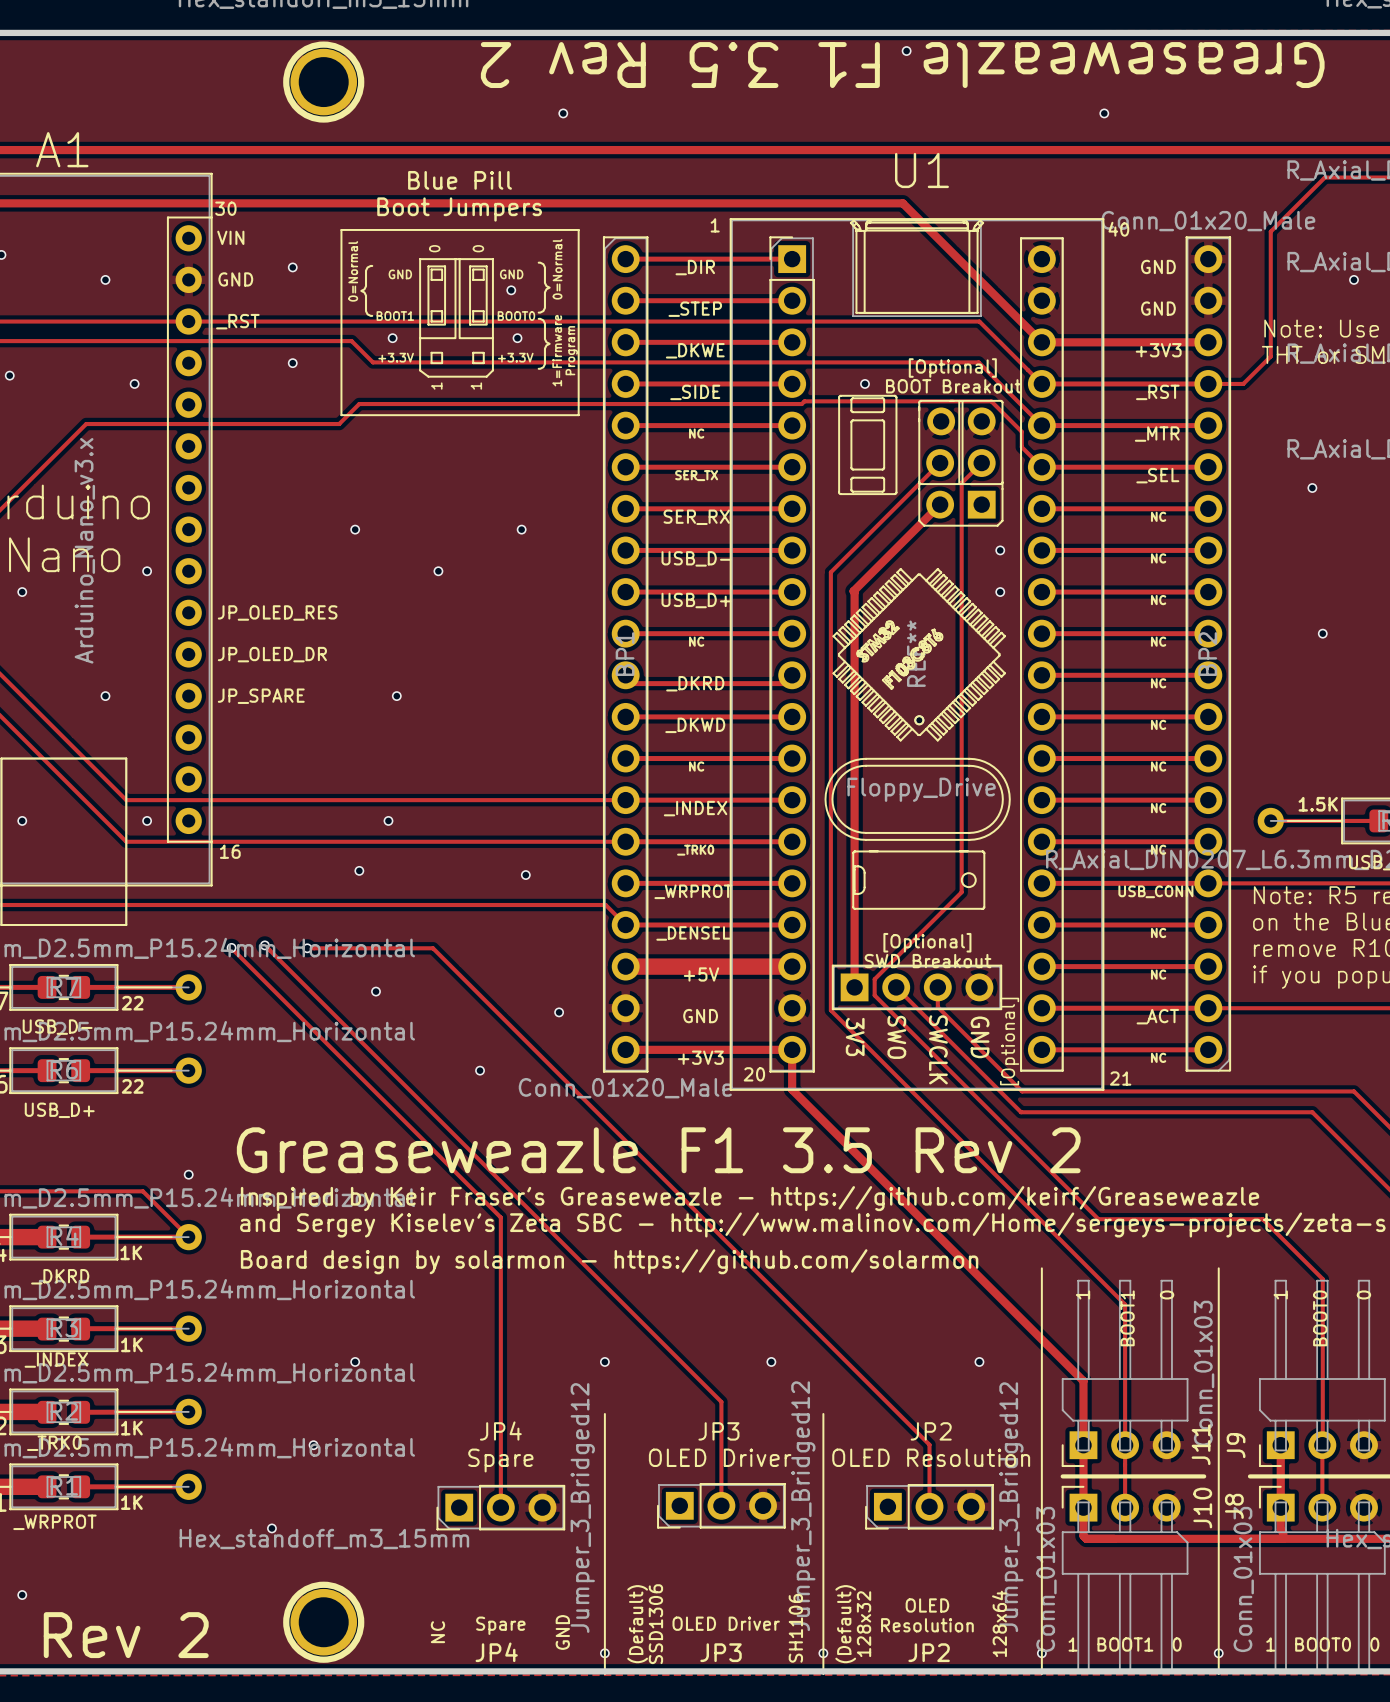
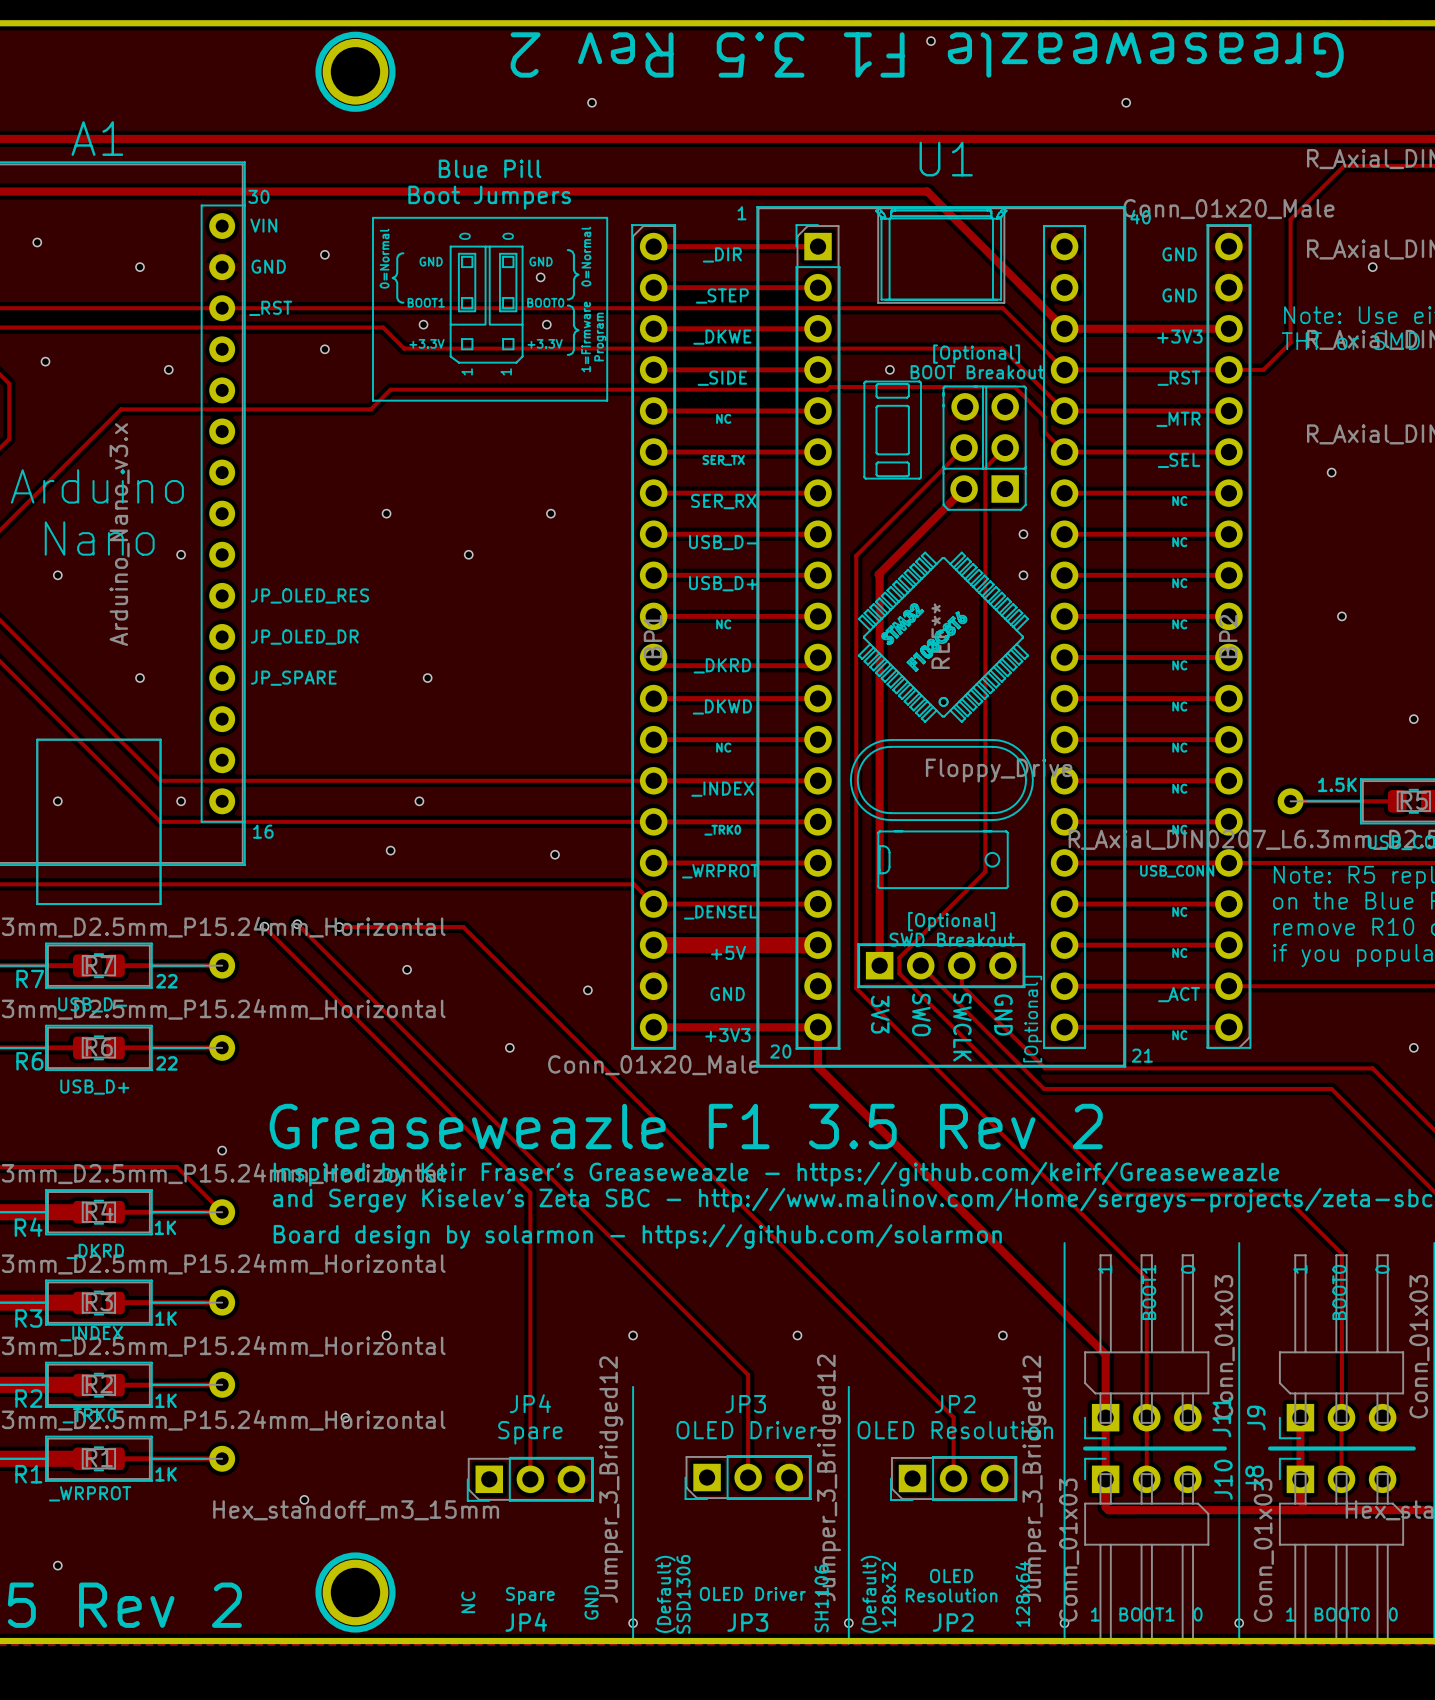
drawing position: (921, 789) -> (999, 770)

